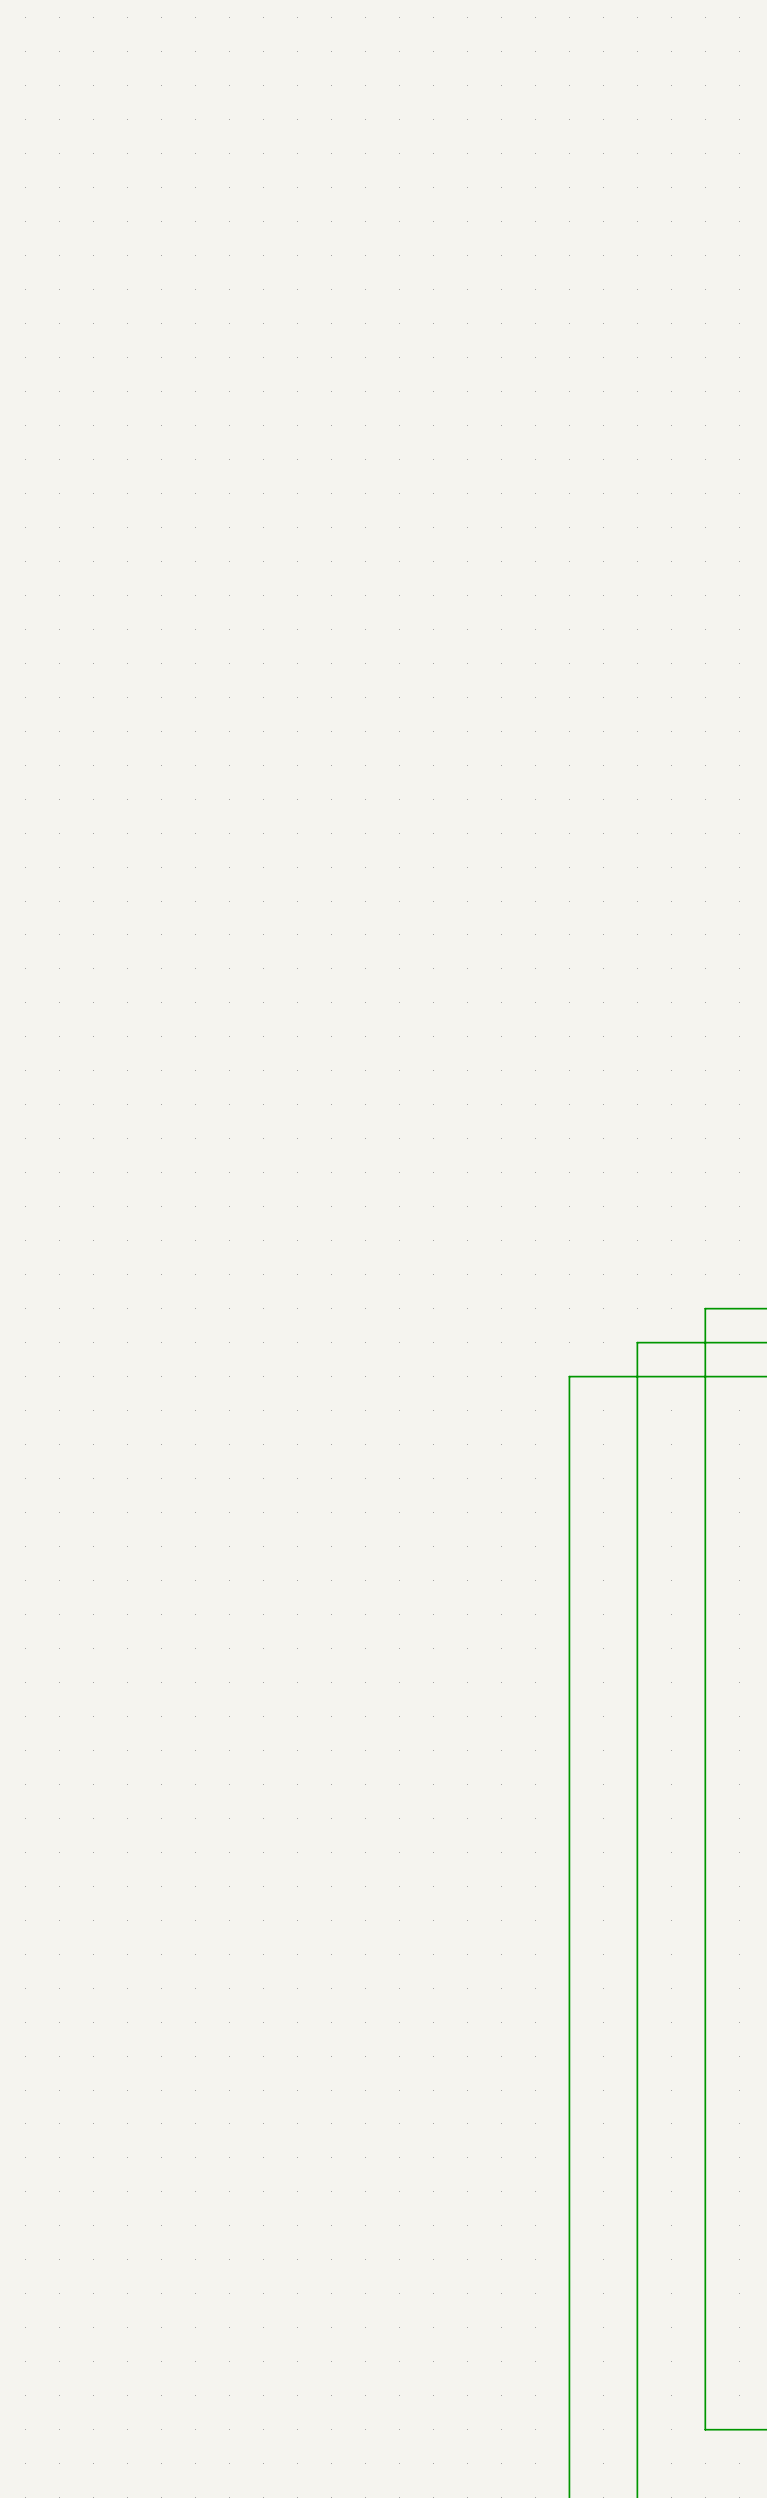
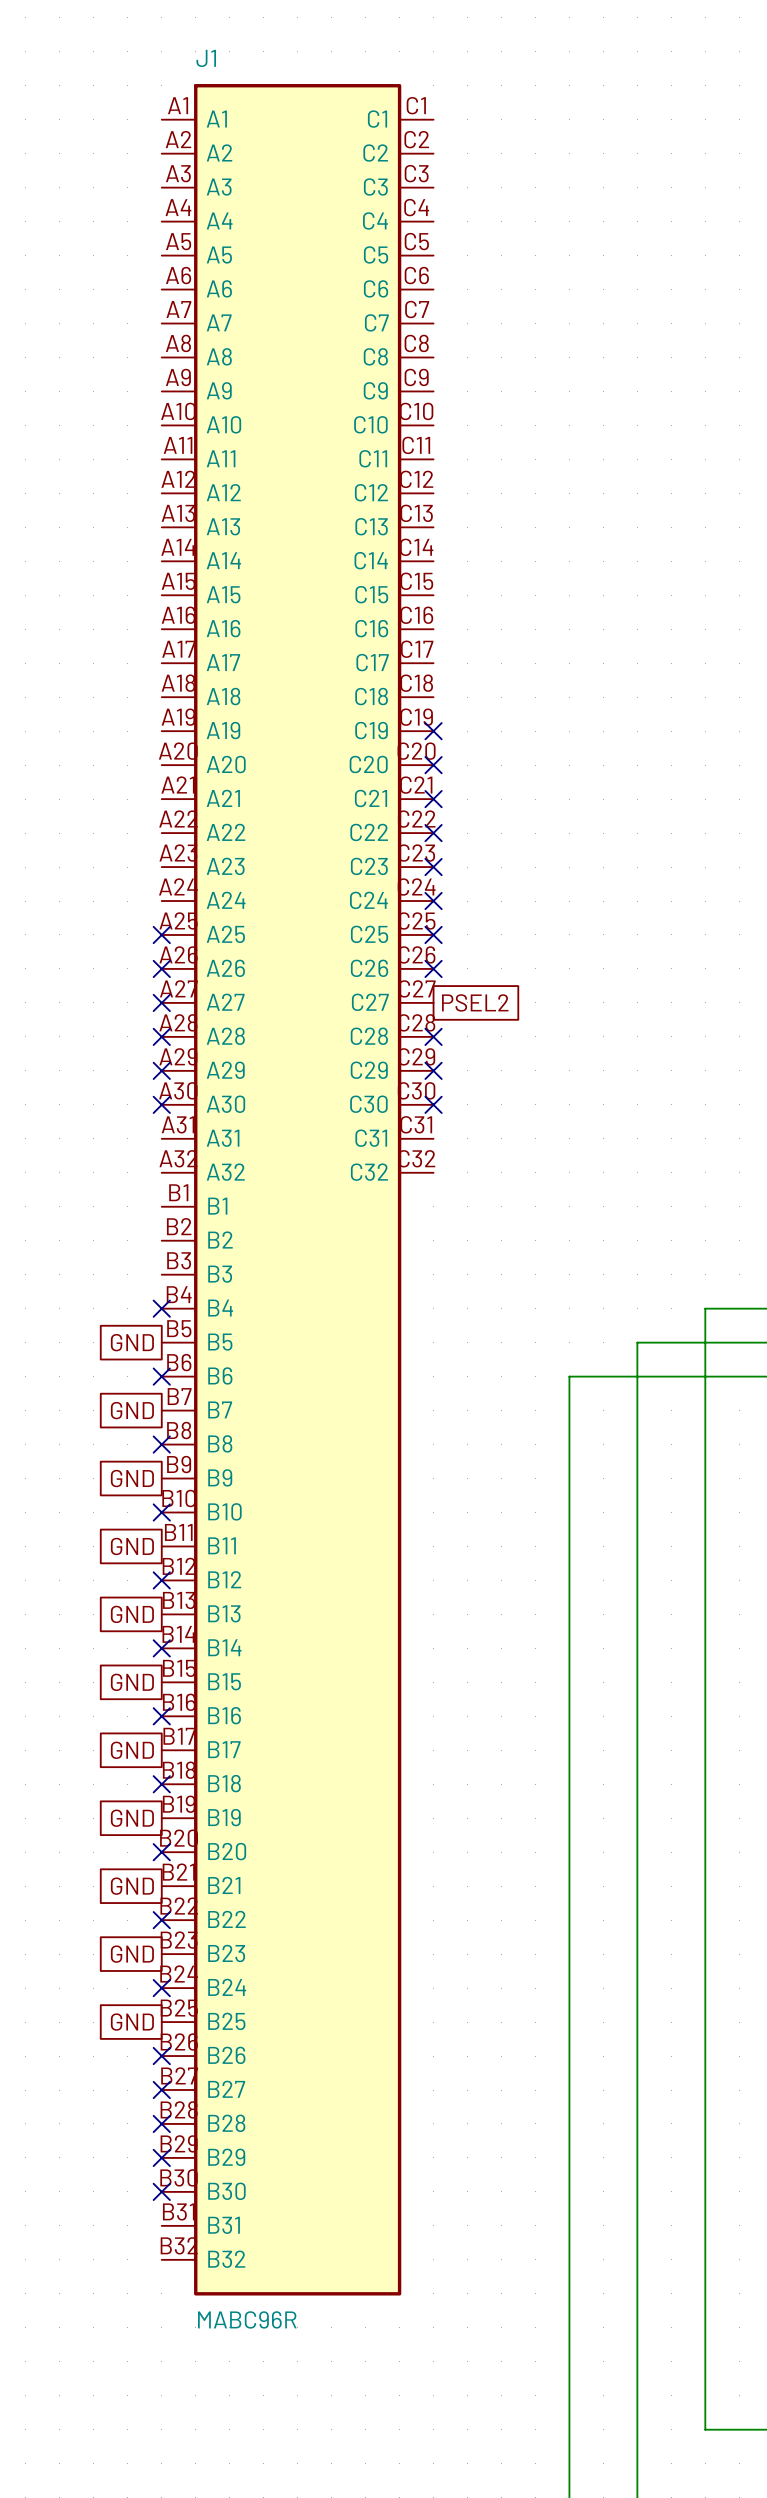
no-connect mark: none -> (433, 731)
no-connect mark: none -> (433, 765)
no-connect mark: none -> (433, 799)
no-connect mark: none -> (433, 833)
no-connect mark: none -> (433, 867)
no-connect mark: none -> (433, 901)
no-connect mark: none -> (161, 934)
no-connect mark: none -> (433, 934)
no-connect mark: none -> (161, 968)
no-connect mark: none -> (433, 968)
no-connect mark: none -> (161, 1002)
global label: none -> PSEL2 (475, 1002)
no-connect mark: none -> (161, 1036)
no-connect mark: none -> (433, 1036)
no-connect mark: none -> (161, 1070)
no-connect mark: none -> (433, 1070)
no-connect mark: none -> (161, 1104)
no-connect mark: none -> (433, 1104)
J1: none -> MABC96R (297, 1189)
no-connect mark: none -> (161, 1308)
global label: none -> GND (132, 1342)
no-connect mark: none -> (161, 1376)
global label: none -> GND (132, 1410)
no-connect mark: none -> (161, 1444)
global label: none -> GND (132, 1478)
no-connect mark: none -> (161, 1512)
global label: none -> GND (132, 1546)
no-connect mark: none -> (161, 1580)
global label: none -> GND (132, 1614)
no-connect mark: none -> (161, 1648)
global label: none -> GND (132, 1682)
no-connect mark: none -> (161, 1716)
global label: none -> GND (132, 1750)
no-connect mark: none -> (161, 1784)
global label: none -> GND (132, 1818)
no-connect mark: none -> (161, 1852)
global label: none -> GND (132, 1886)
no-connect mark: none -> (161, 1920)
global label: none -> GND (132, 1954)
no-connect mark: none -> (161, 1988)
global label: none -> GND (132, 2022)
no-connect mark: none -> (161, 2056)
no-connect mark: none -> (161, 2090)
no-connect mark: none -> (161, 2123)
no-connect mark: none -> (161, 2157)
no-connect mark: none -> (161, 2191)

